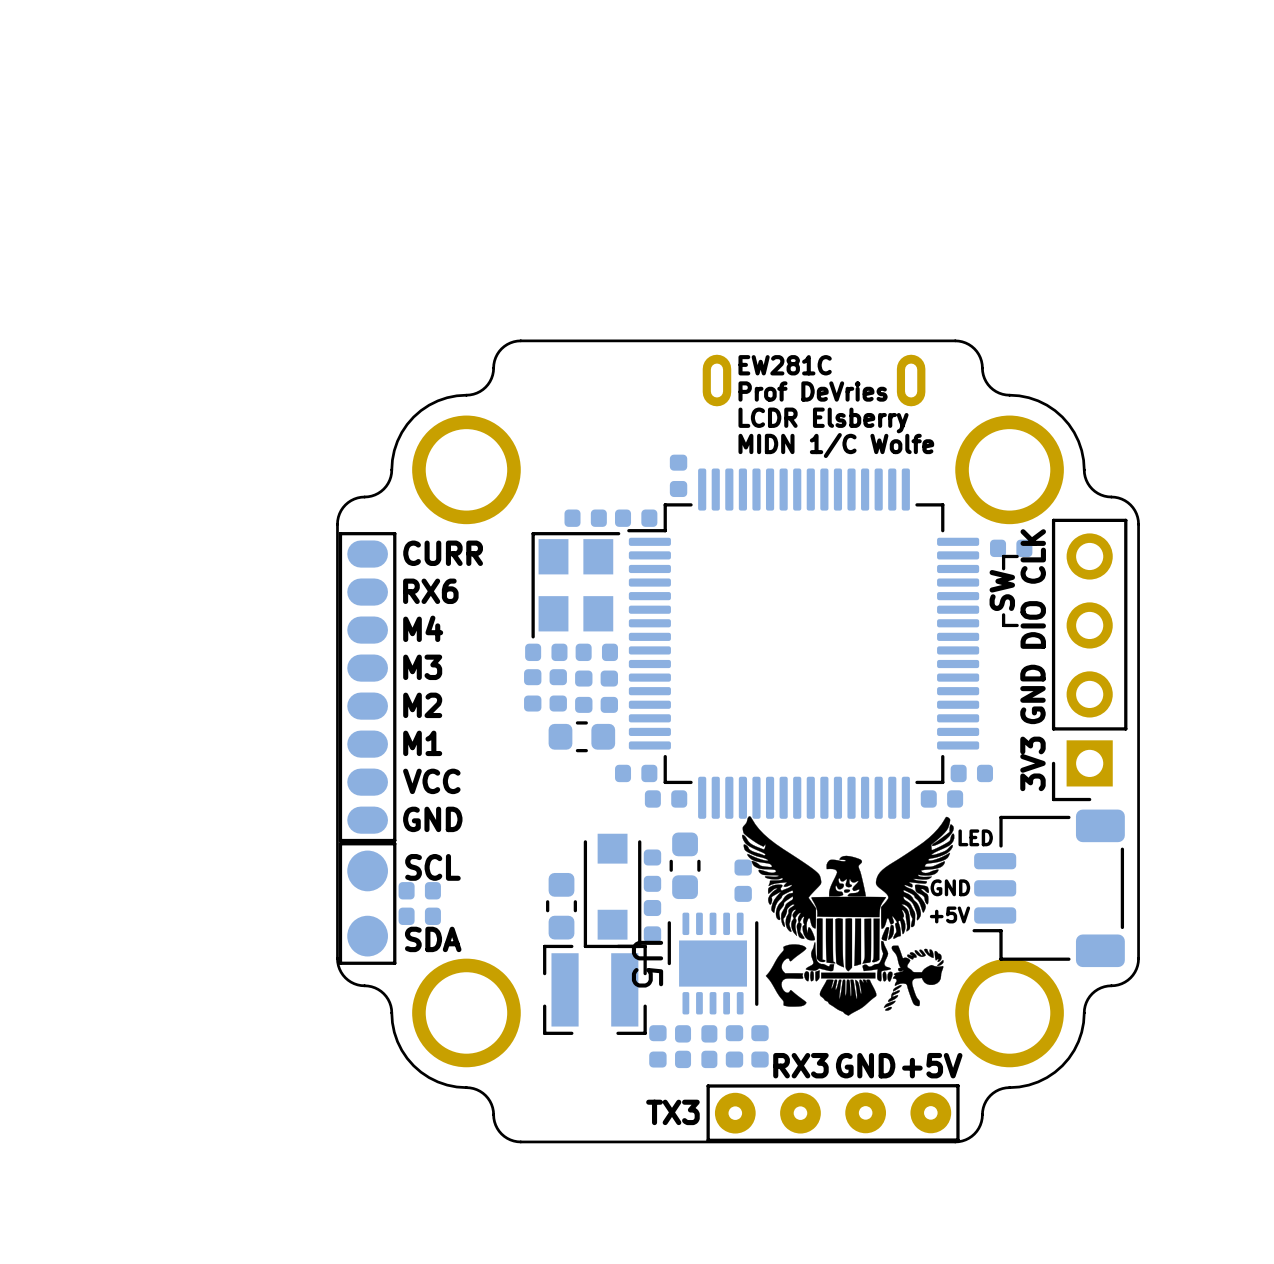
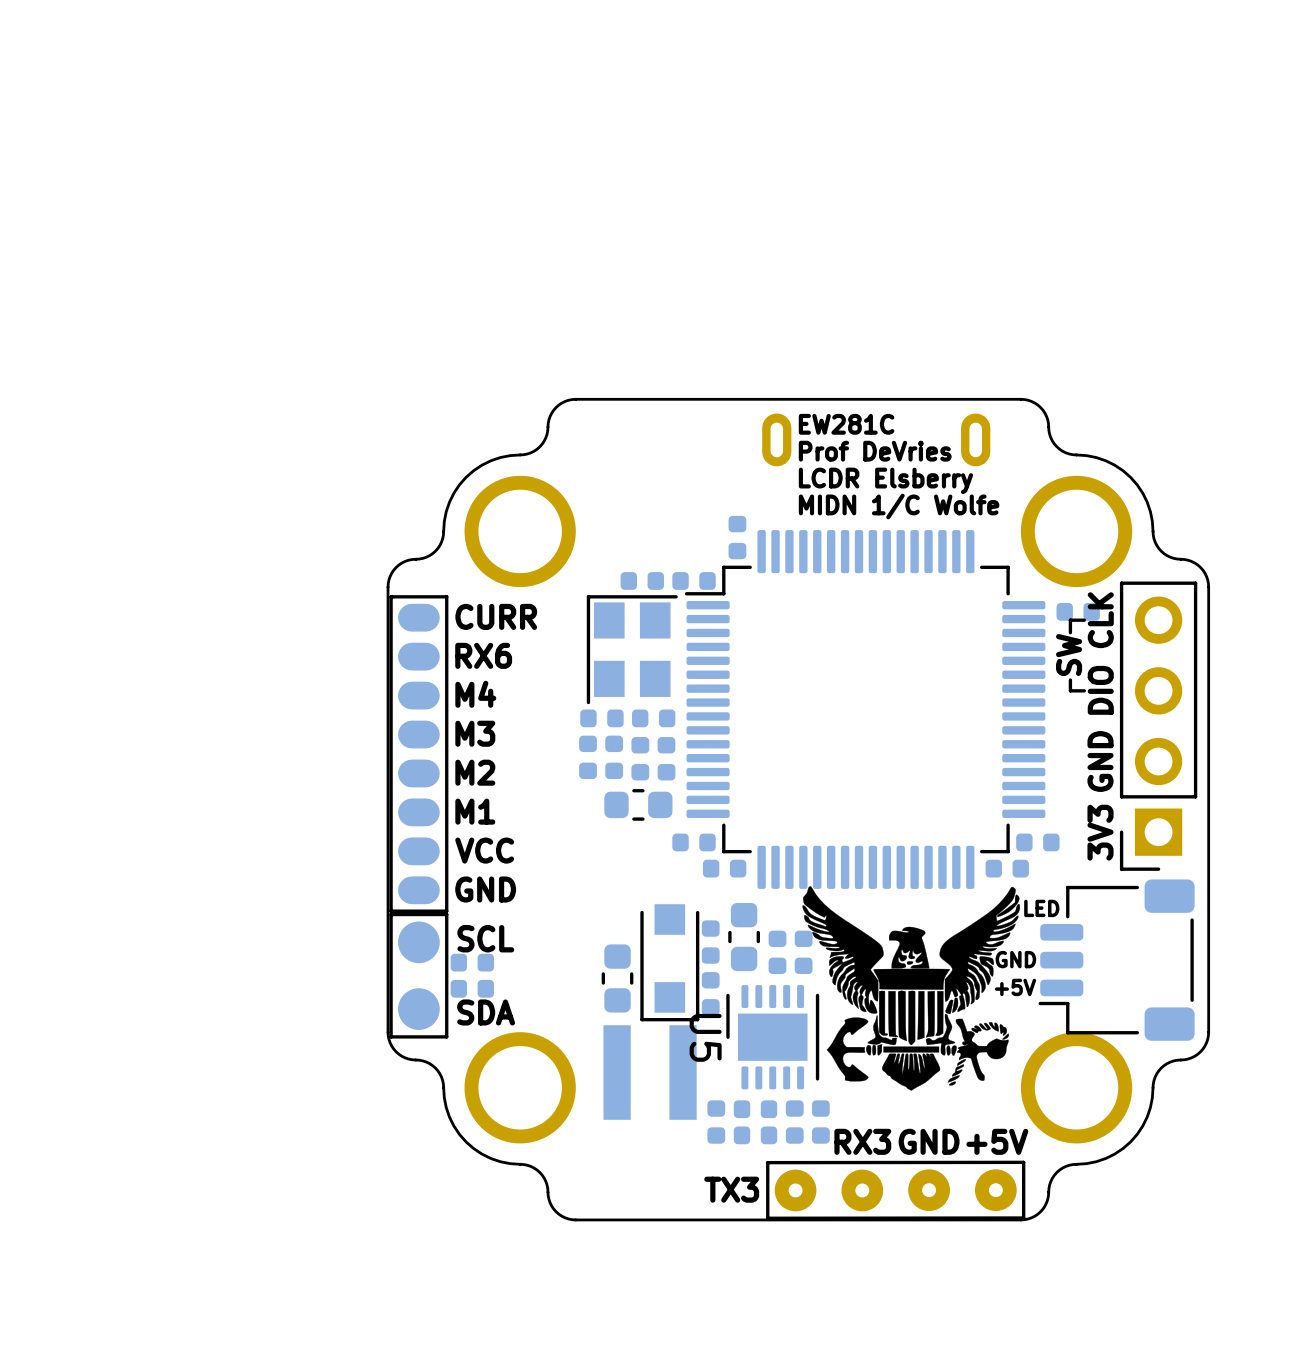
part: none -> (777, 952)
part footprint: [543, 944, 647, 1035] -> [603, 1025, 697, 1120]

